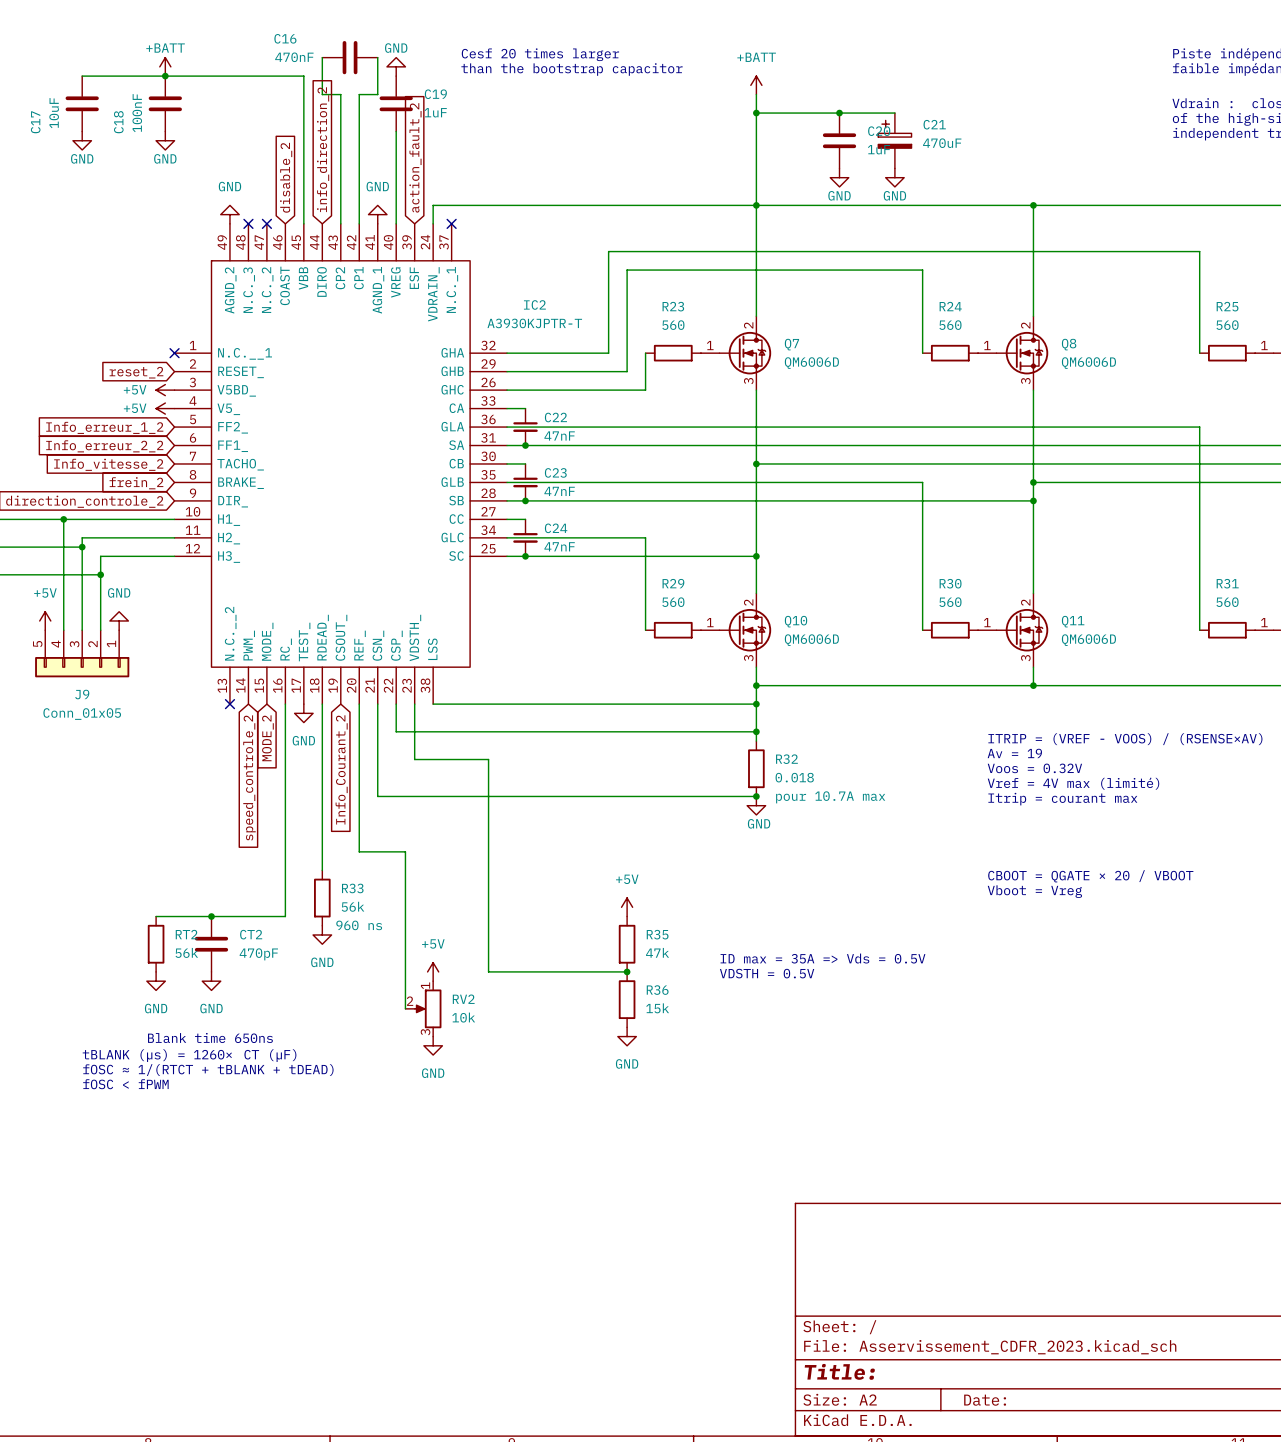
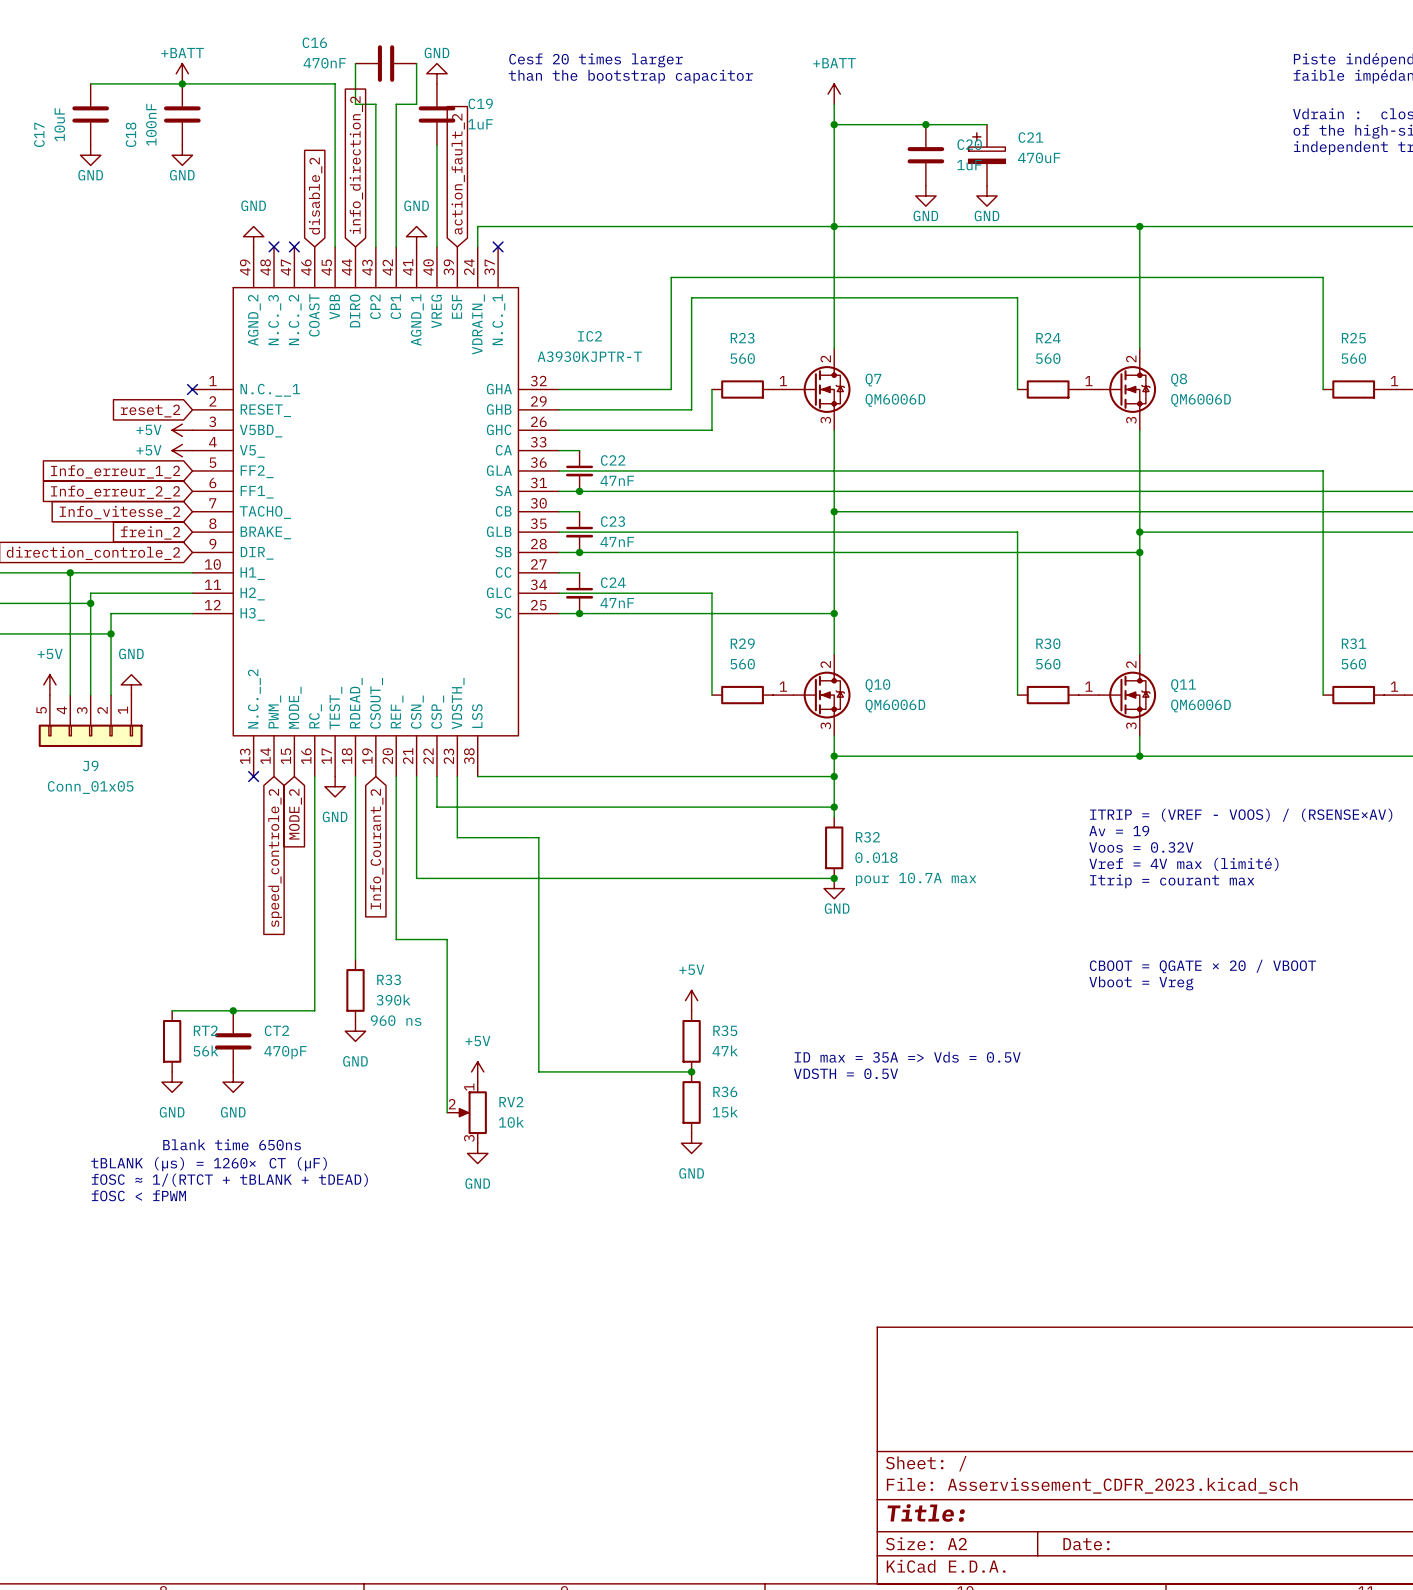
R33 value: 56k (353, 906) -> 390k (393, 1000)

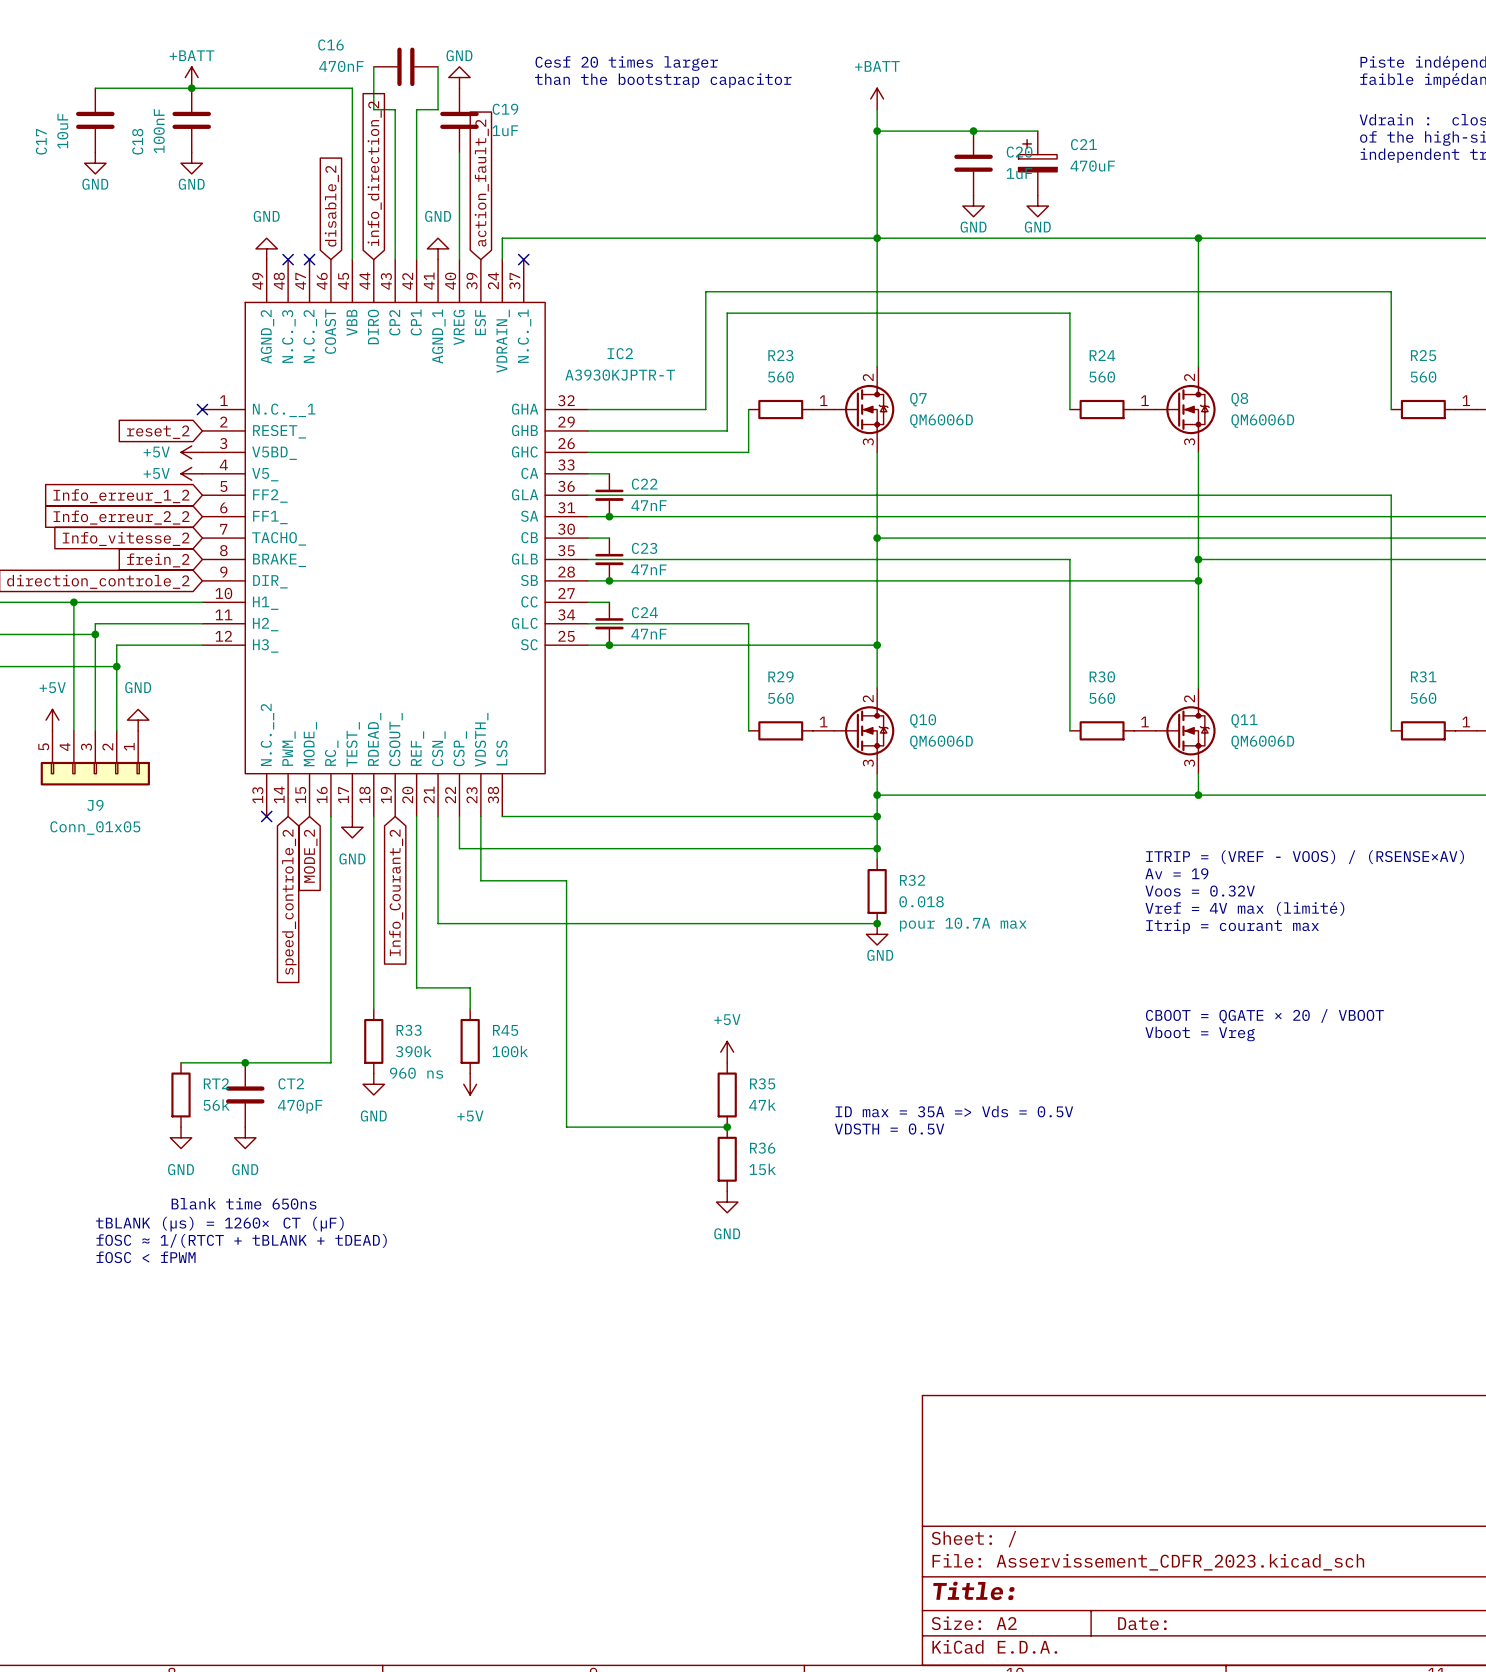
wire: (447, 959) (447, 1112) -> none
R45: none -> 100k (470, 1041)
power symbol rotation: 0° (477, 1071) -> 180° (470, 1084)
power symbol position: +5V (477, 1071) -> +5V (470, 1084)
RV2: 10k (467, 1112) -> none
power symbol: GND (477, 1153) -> none

